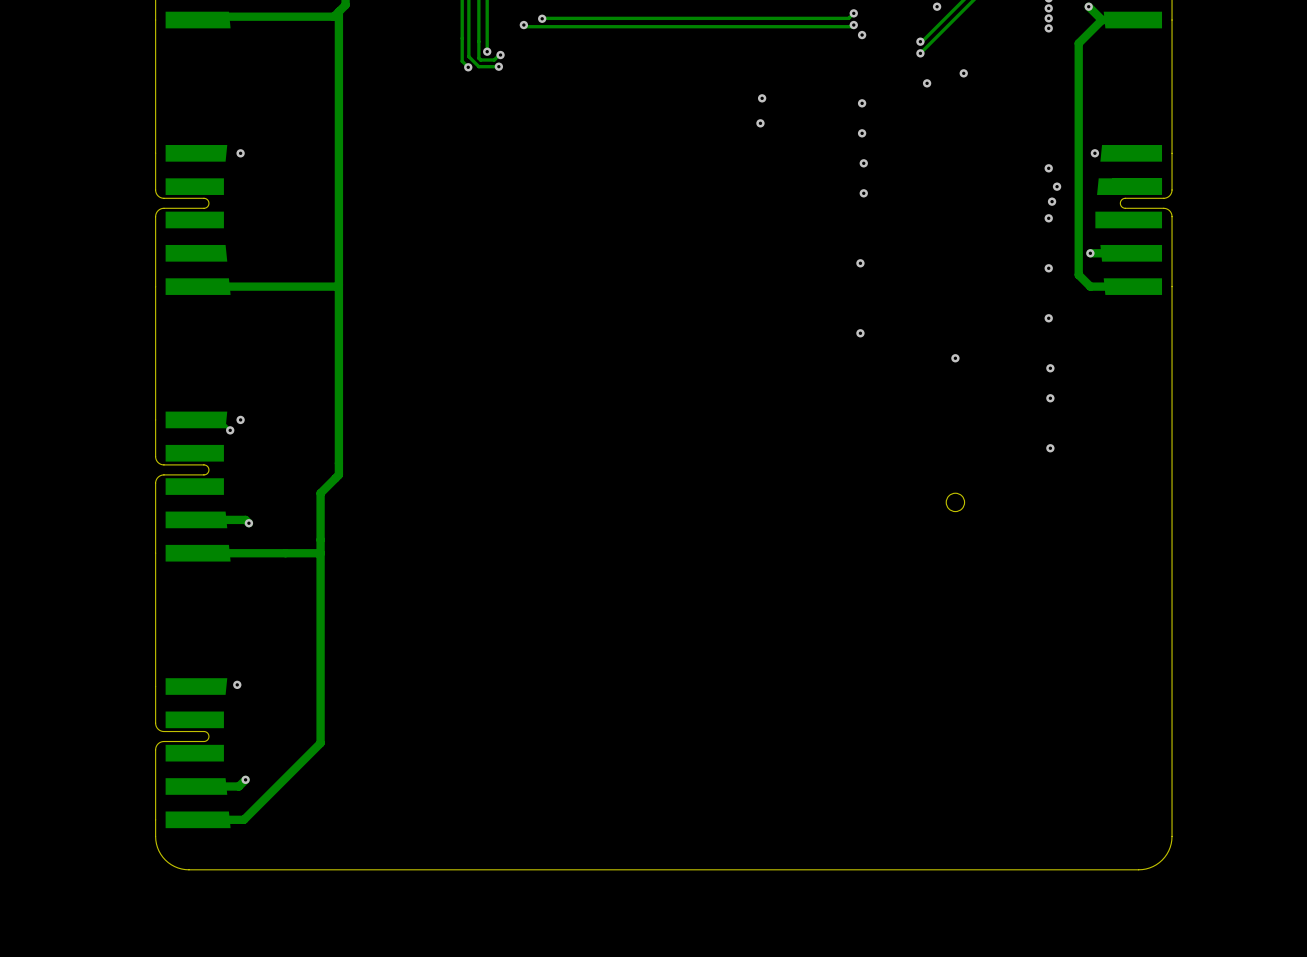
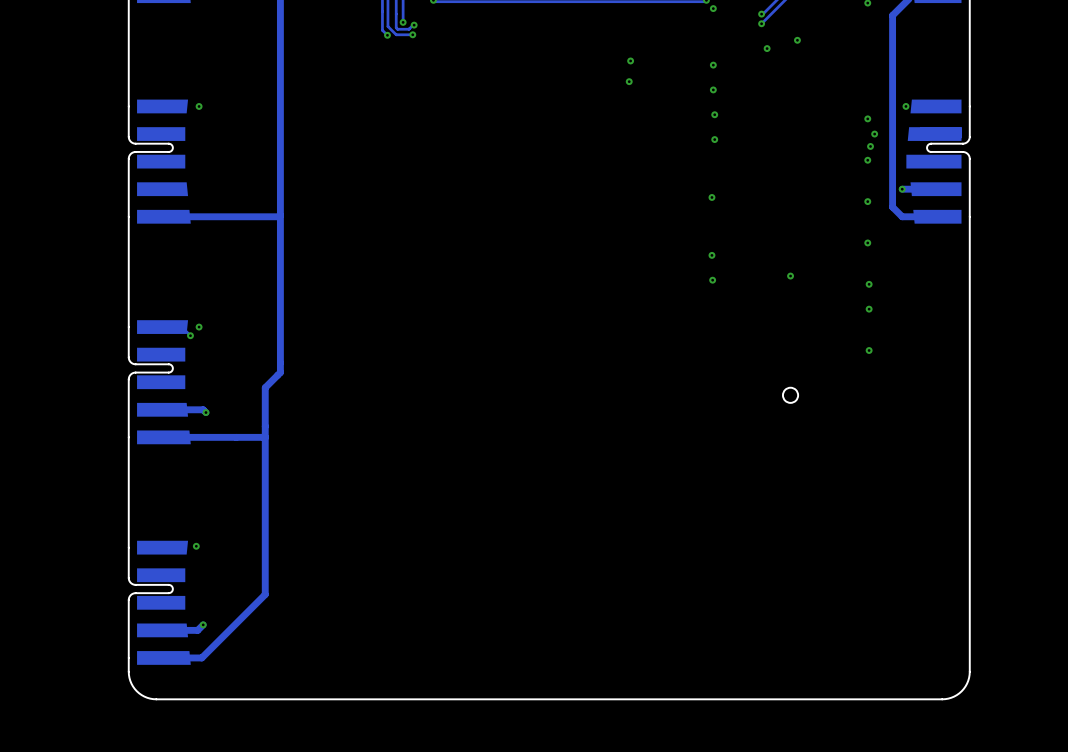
via: none -> (712, 280)

